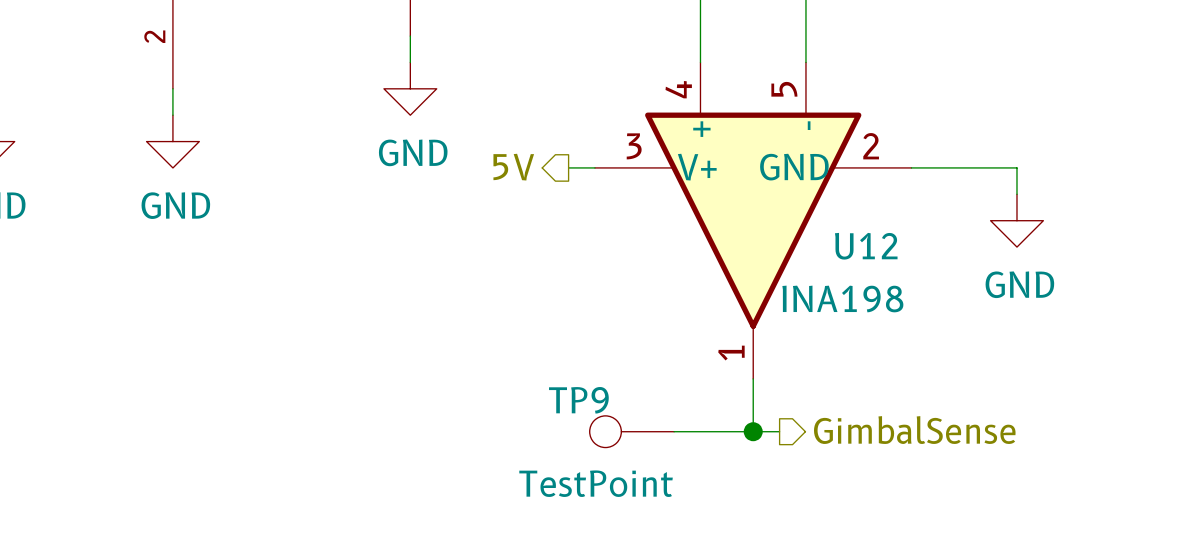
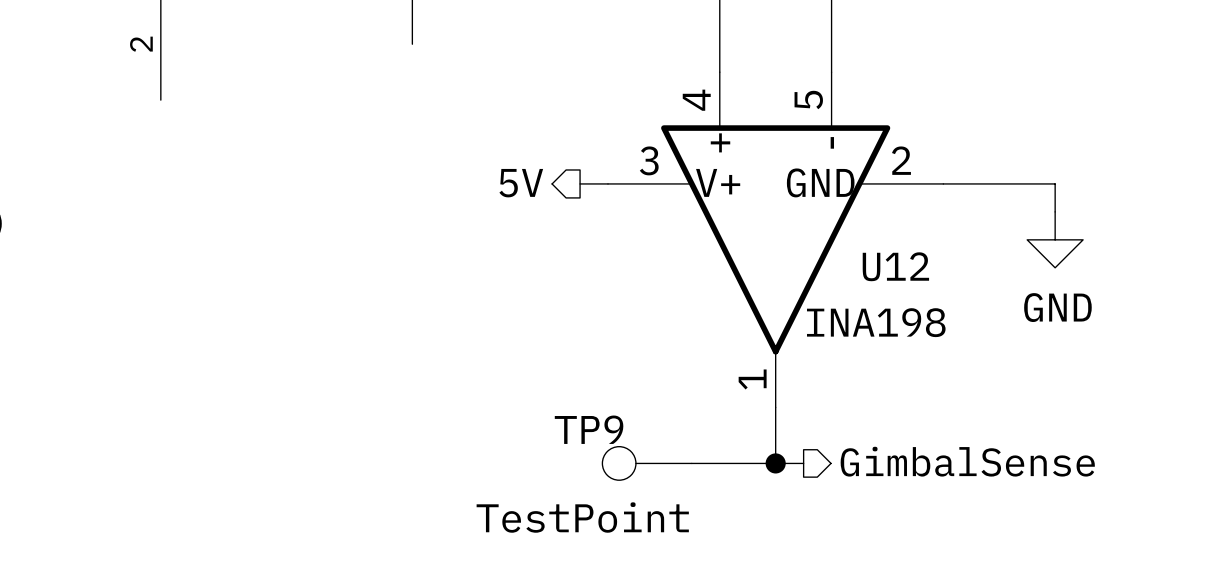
wire: (410, 36) (410, 62) -> none
wire: (172, 88) (172, 115) -> none
power symbol: GND (410, 88) -> none
power symbol: GND (172, 141) -> none

